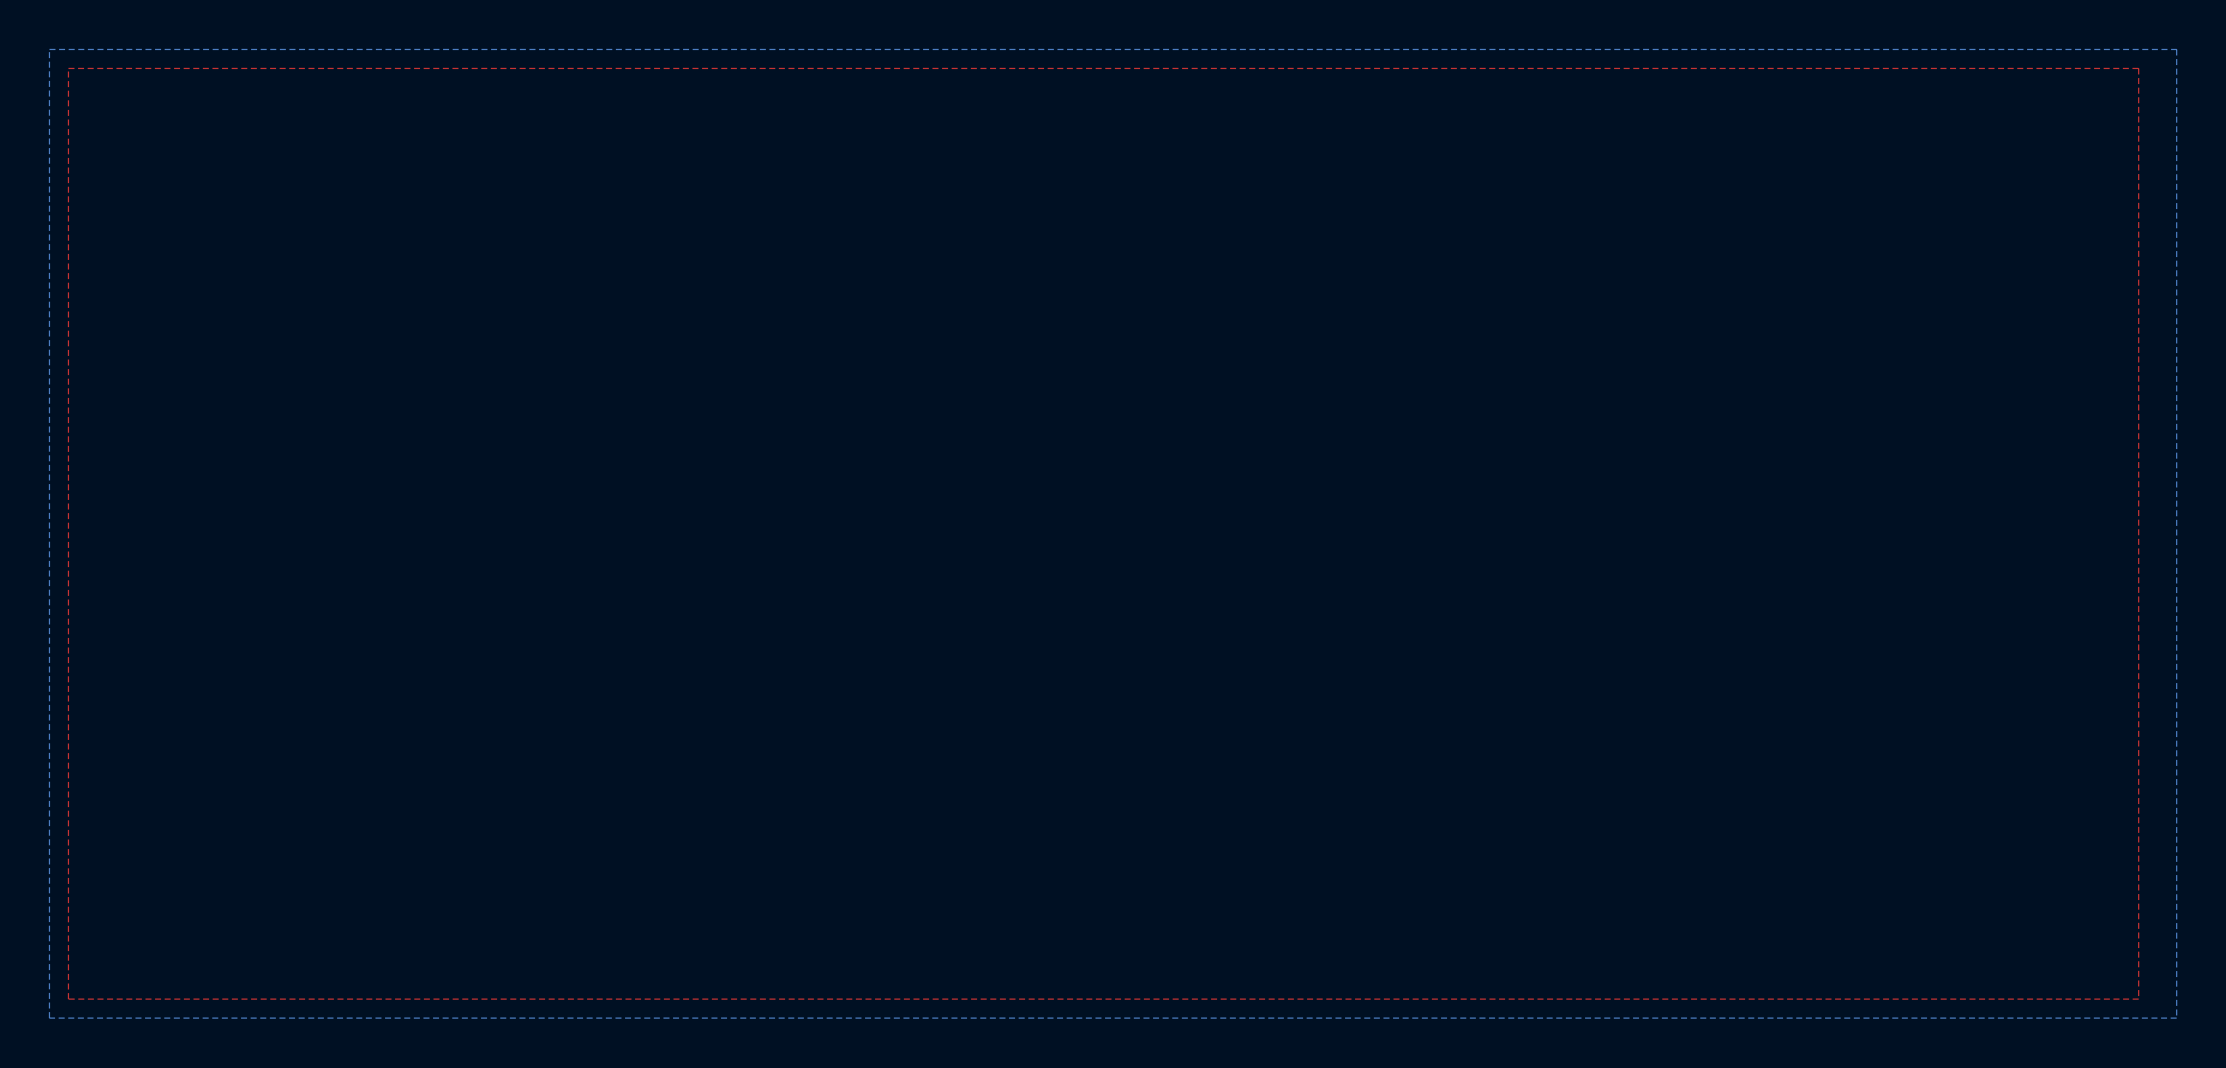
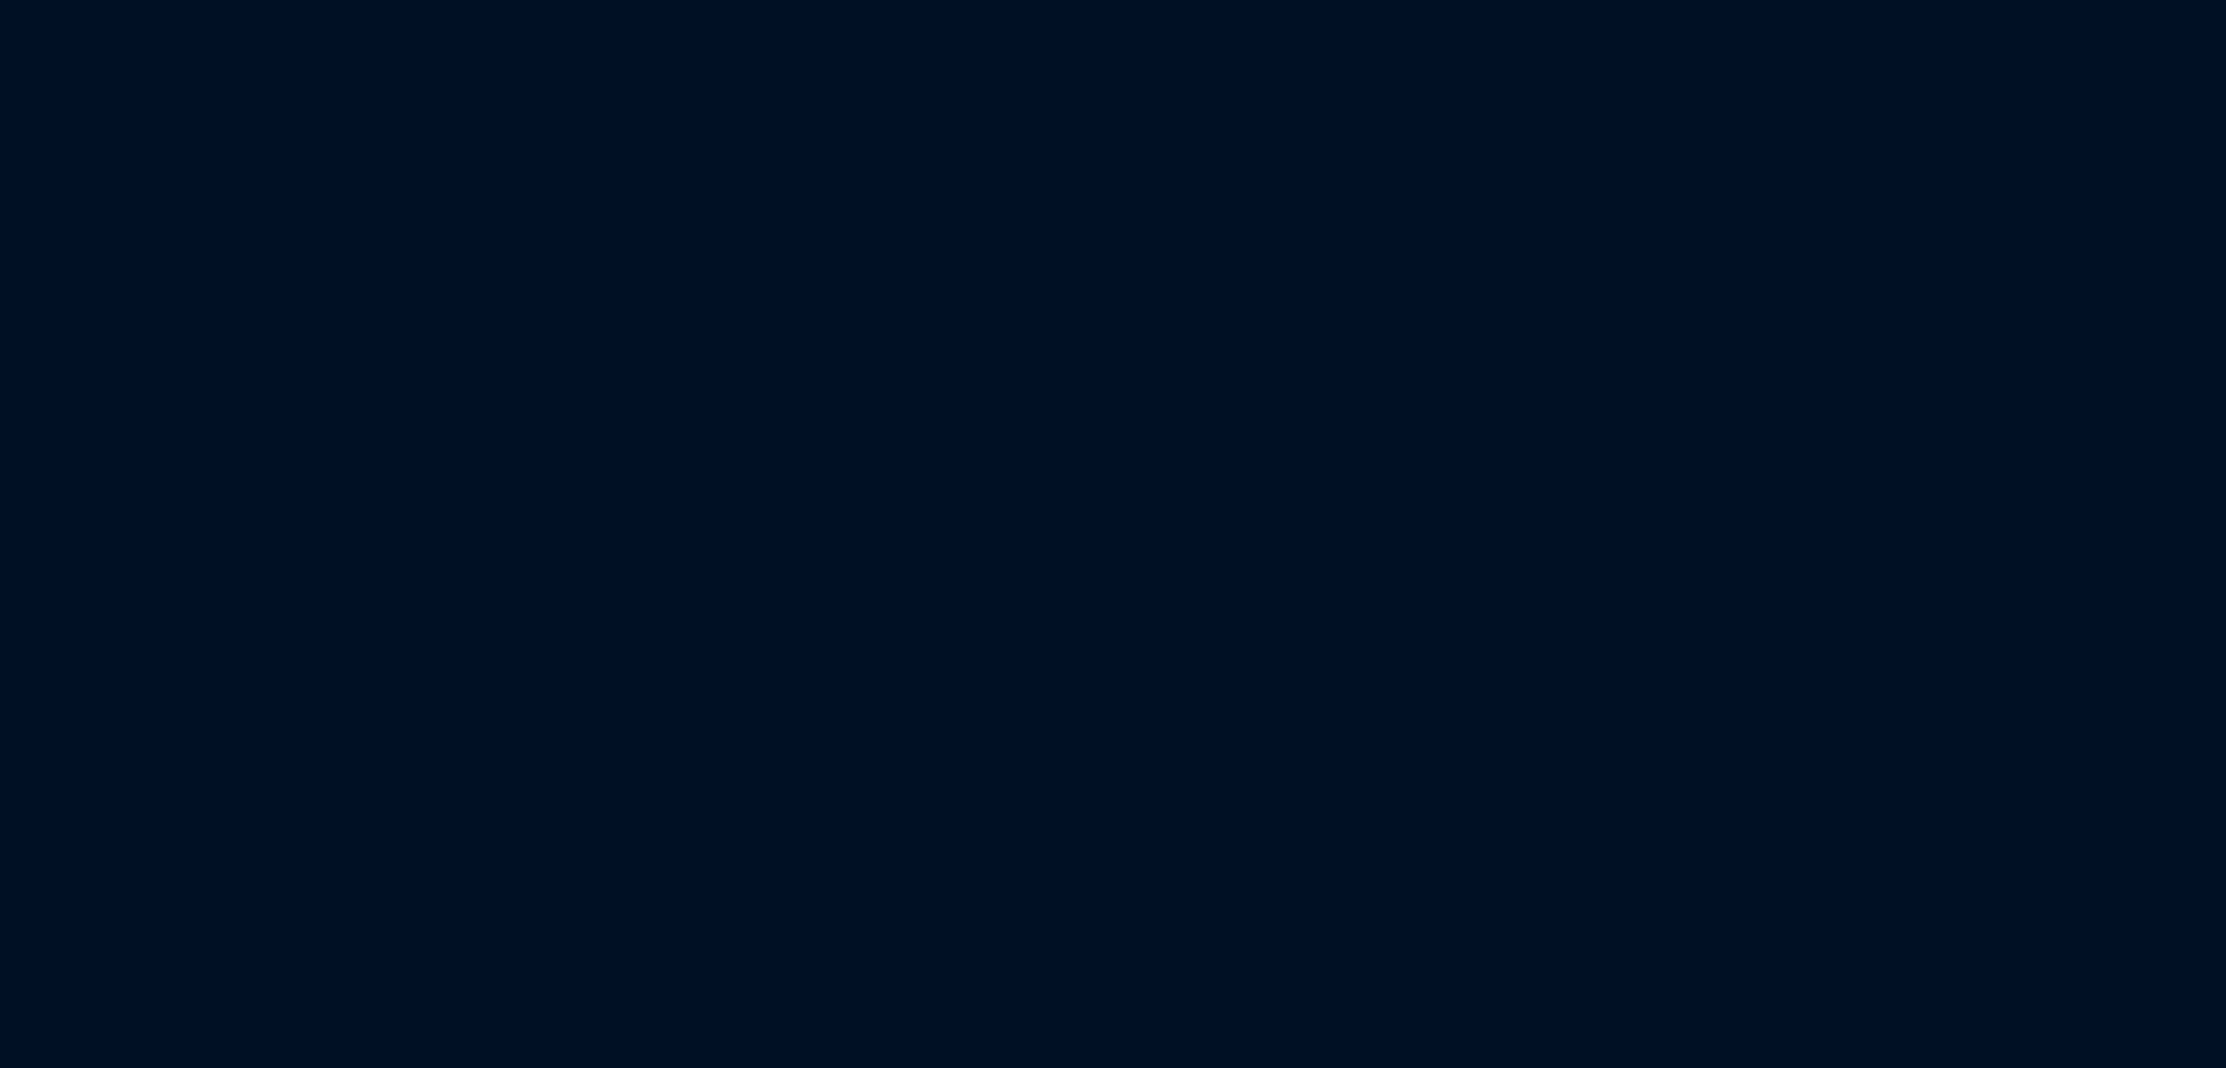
bottom zone outline: (49, 49) (49, 1018) (2176, 1018) (2176, 49) (49, 49) -> none
top zone outline: (68, 68) (68, 999) (2138, 999) (2138, 68) (68, 68) -> none

